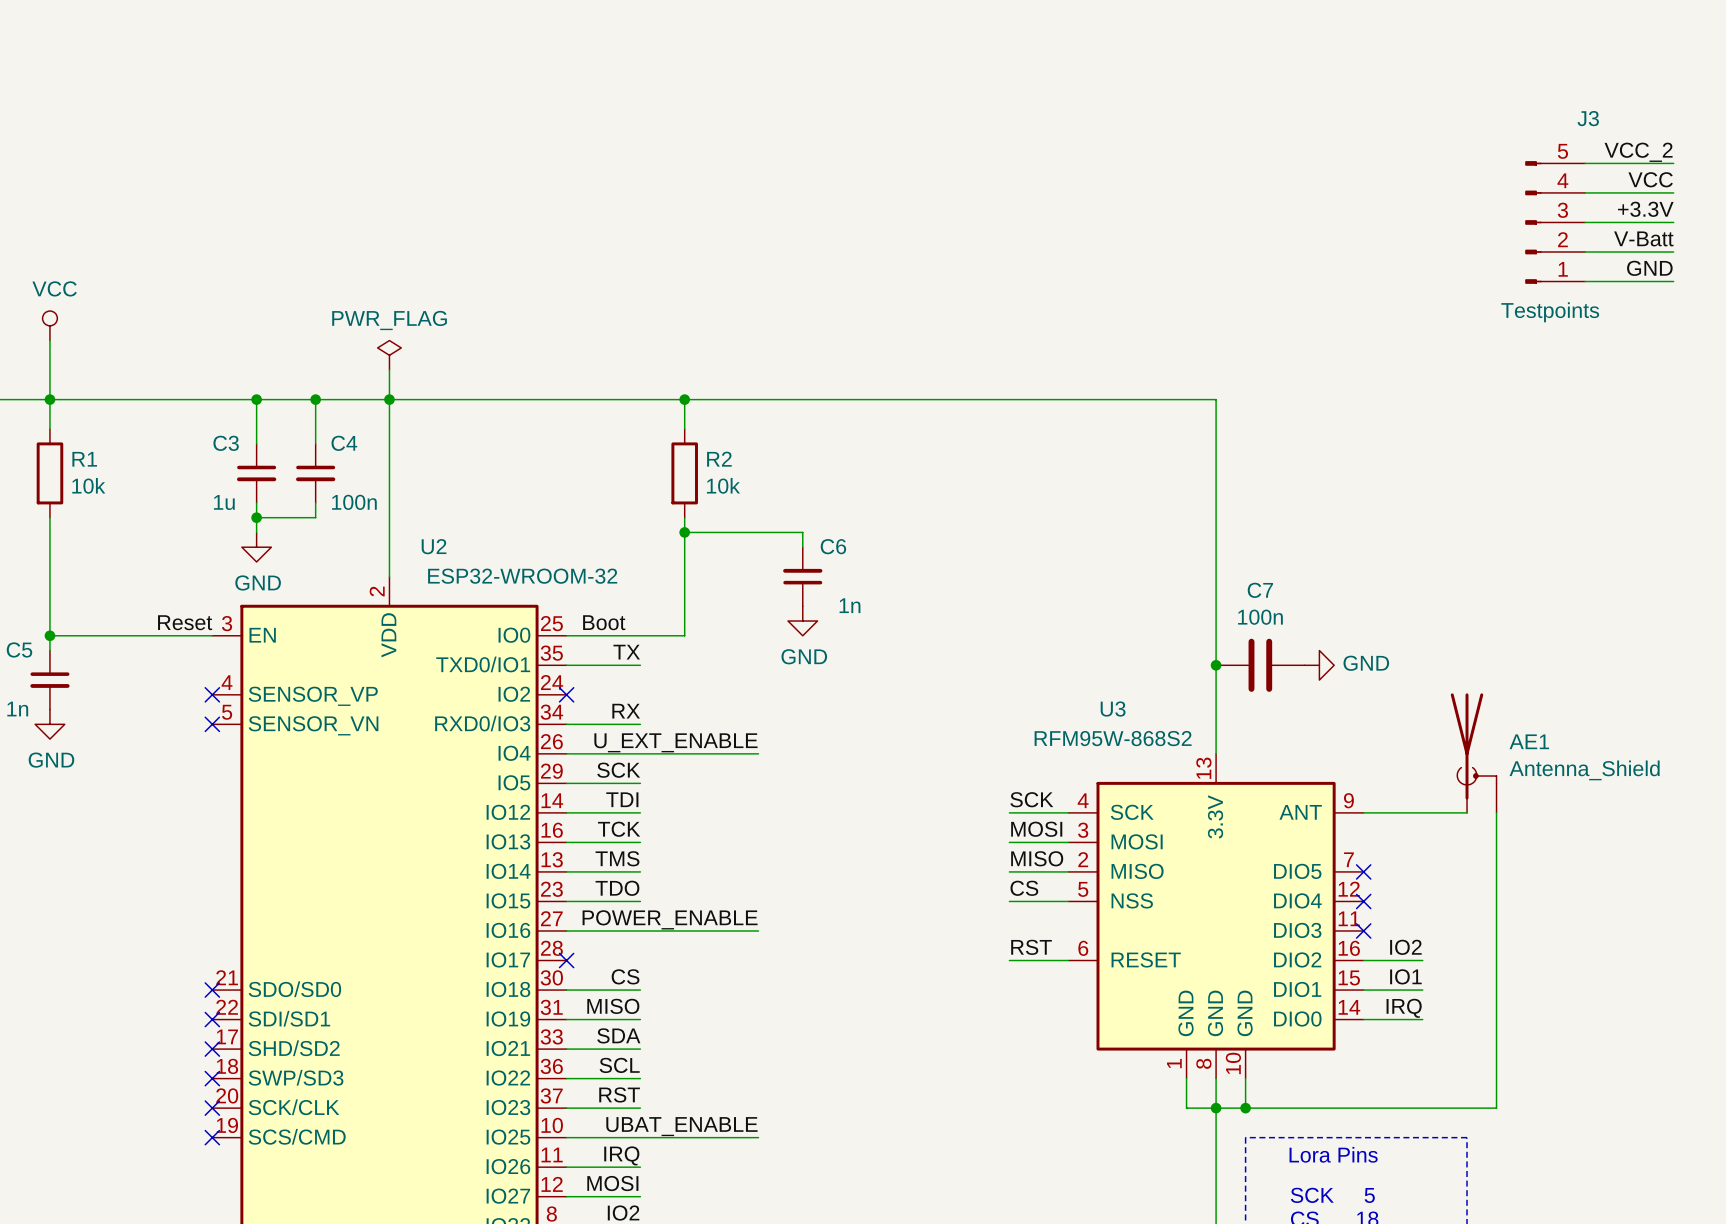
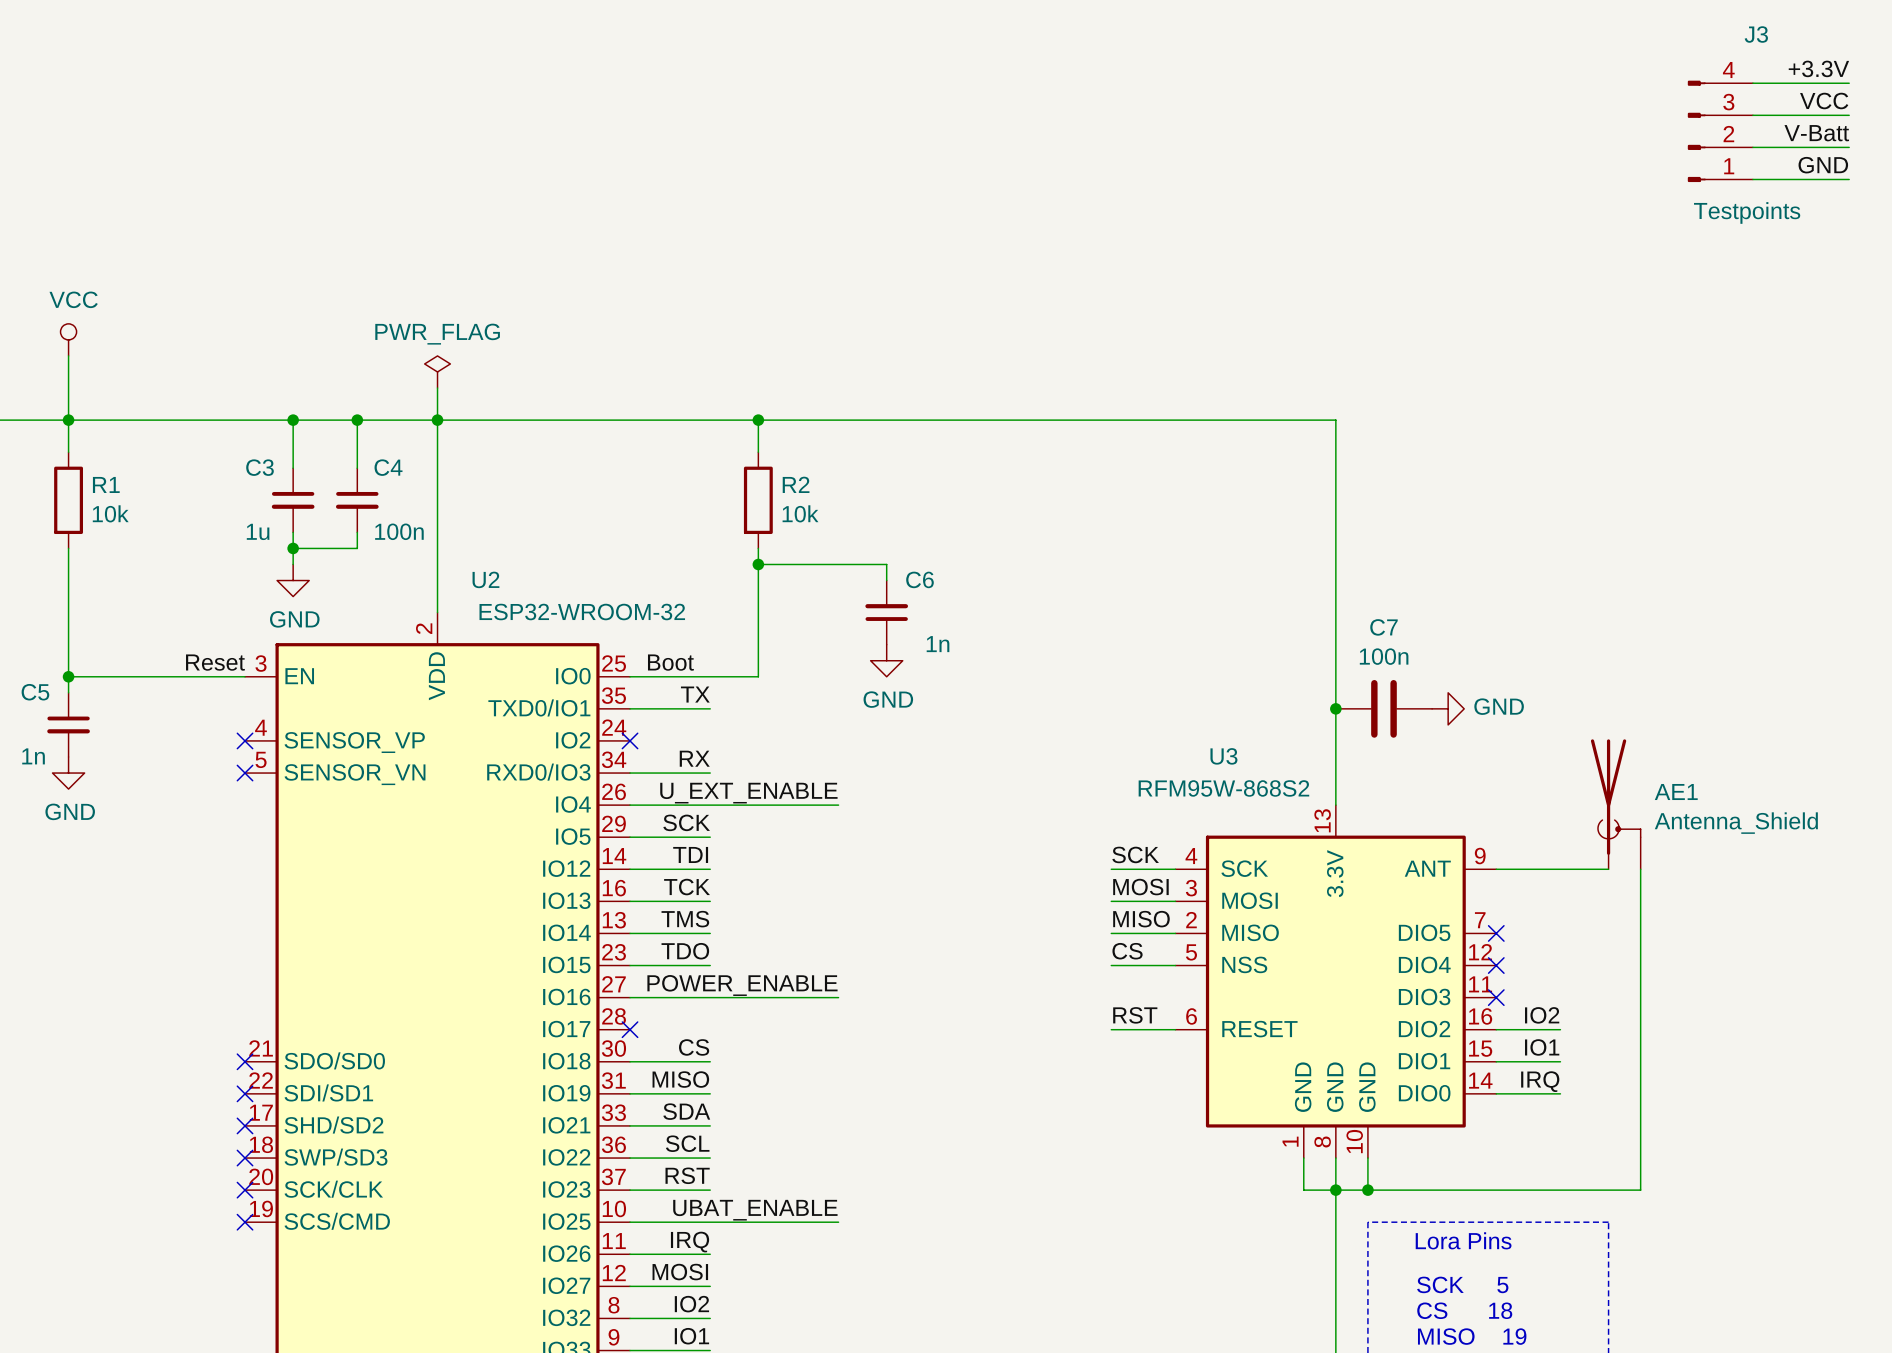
label: VCC_2 (1638, 152) -> none
J3 symbol: [1525, 161, 1586, 284] -> [1687, 80, 1753, 183]
wire: (1585, 163) (1673, 163) -> (1752, 83) (1849, 83)
label position: VCC (1650, 179) -> VCC (1824, 101)
wire: (1585, 192) (1673, 192) -> (1752, 115) (1849, 115)
label position: +3.3V (1645, 209) -> +3.3V (1818, 68)
wire: (1585, 222) (1673, 222) -> (1752, 147) (1849, 147)
label position: V-Batt (1643, 238) -> V-Batt (1816, 133)
wire: (1585, 251) (1673, 251) -> (1752, 179) (1849, 179)
label position: GND (1649, 268) -> GND (1823, 165)
wire: (1585, 281) (1673, 281) -> none
J3 value position: Testpoints (1550, 312) -> Testpoints (1747, 212)

